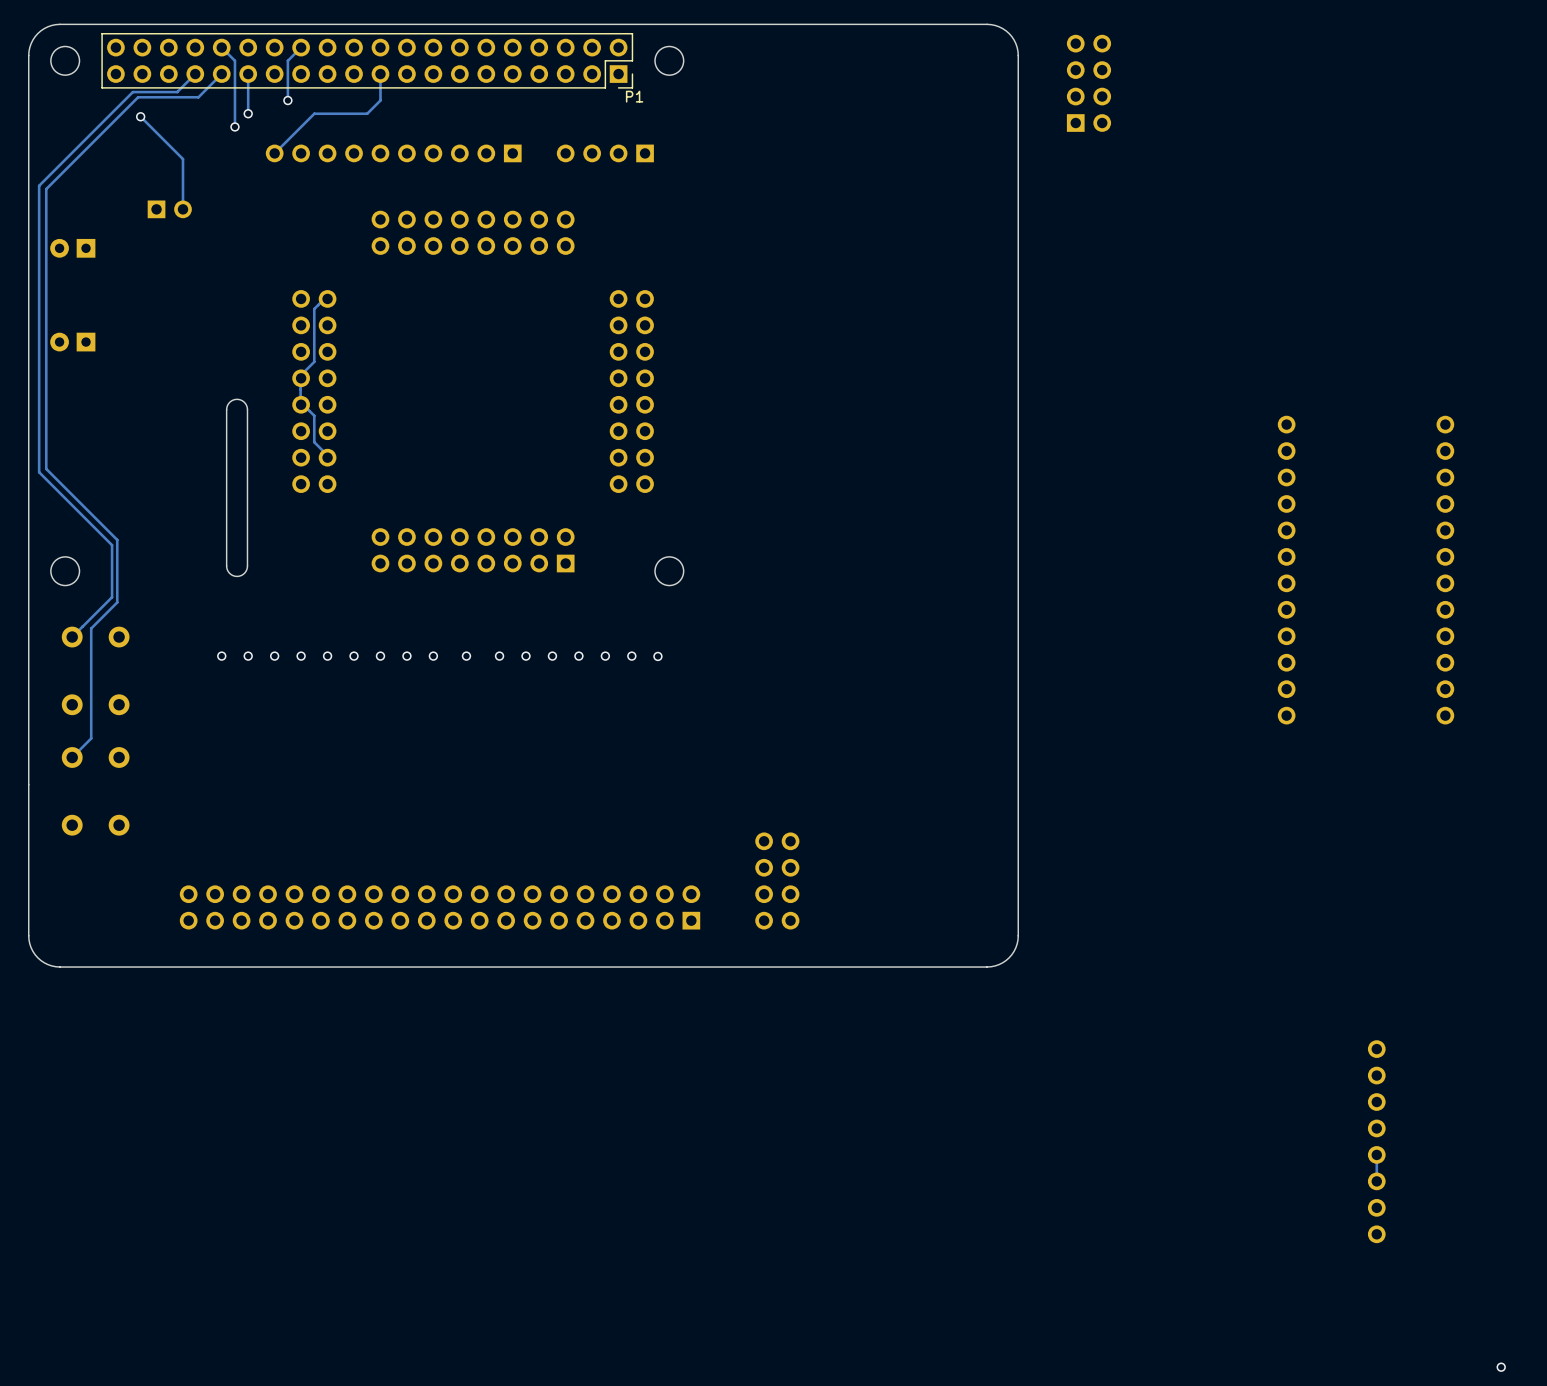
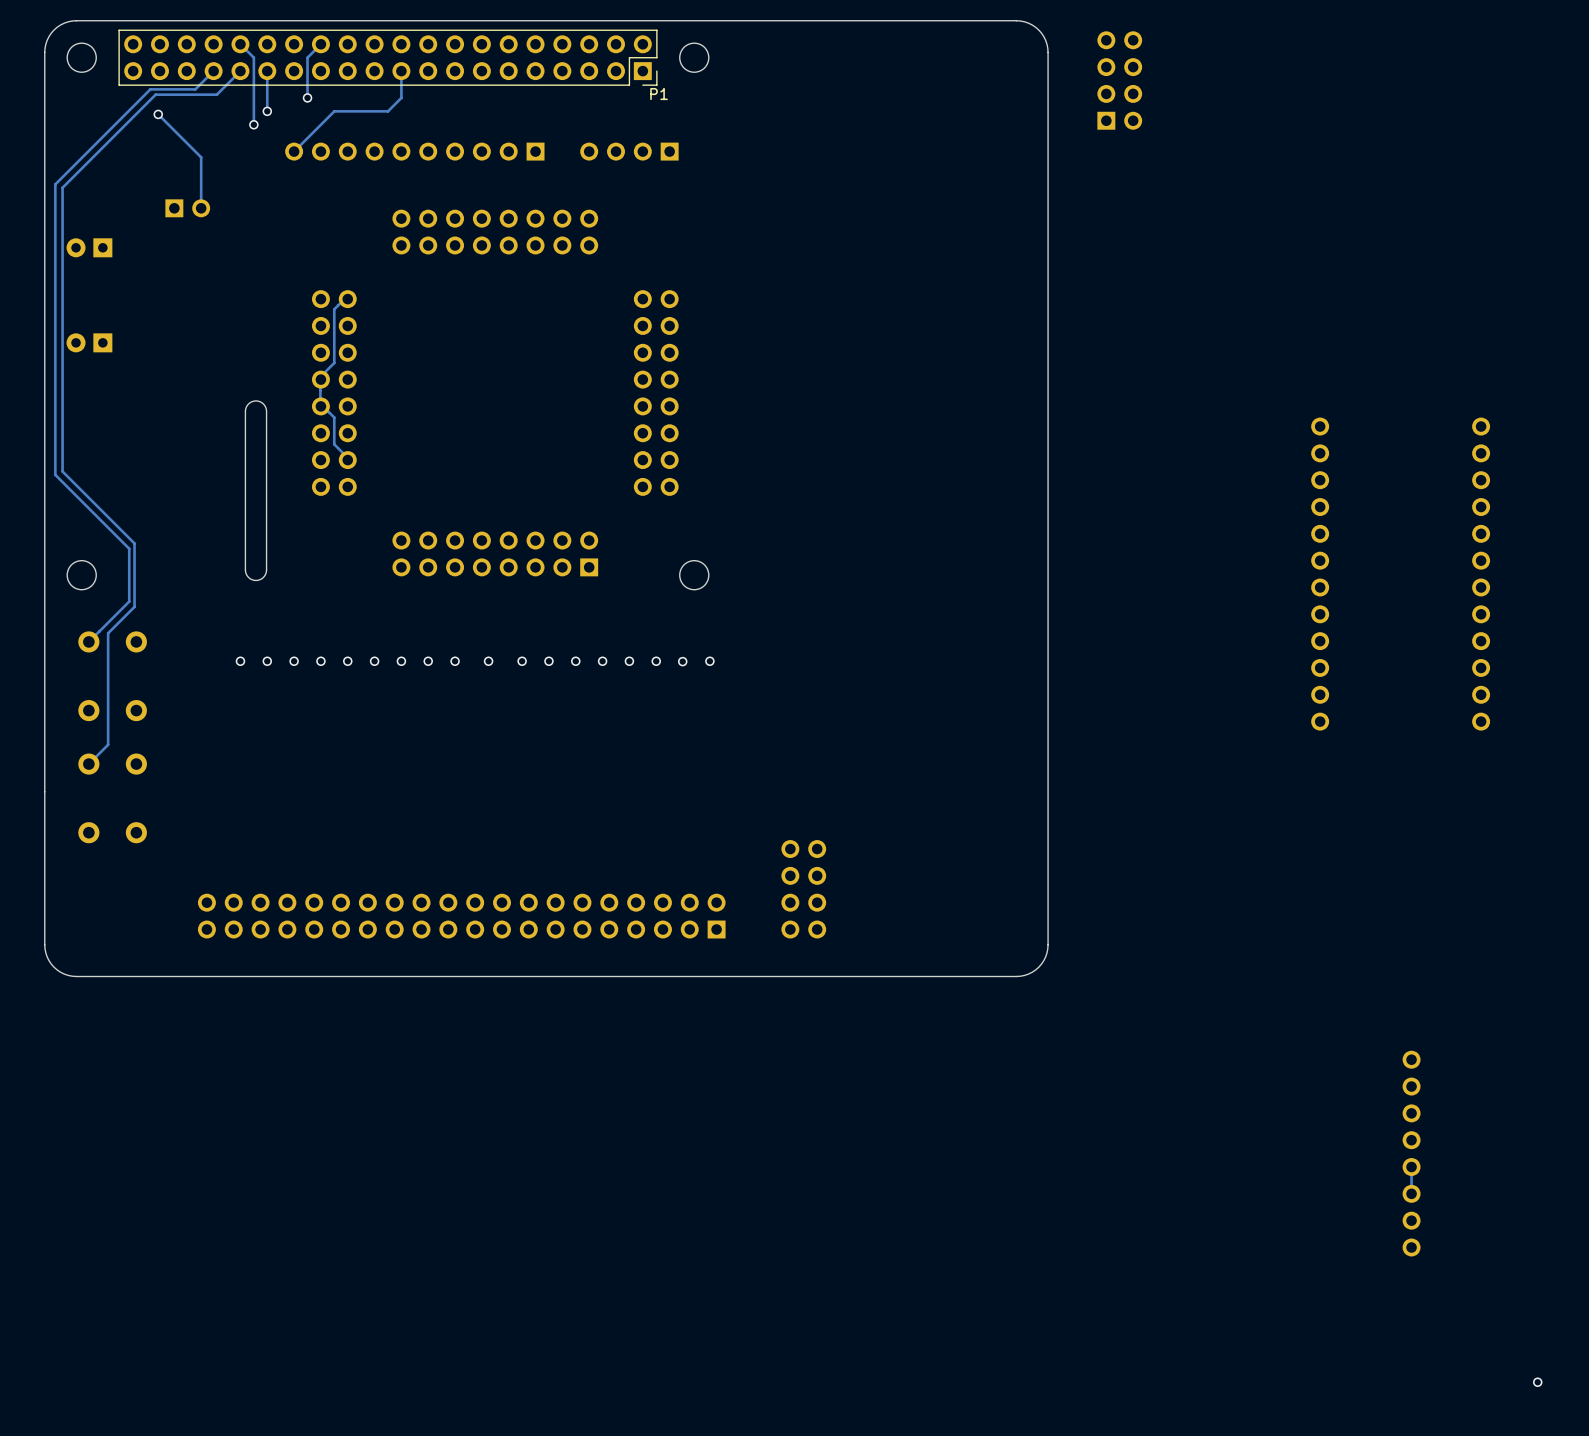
via: none -> (709, 661)

